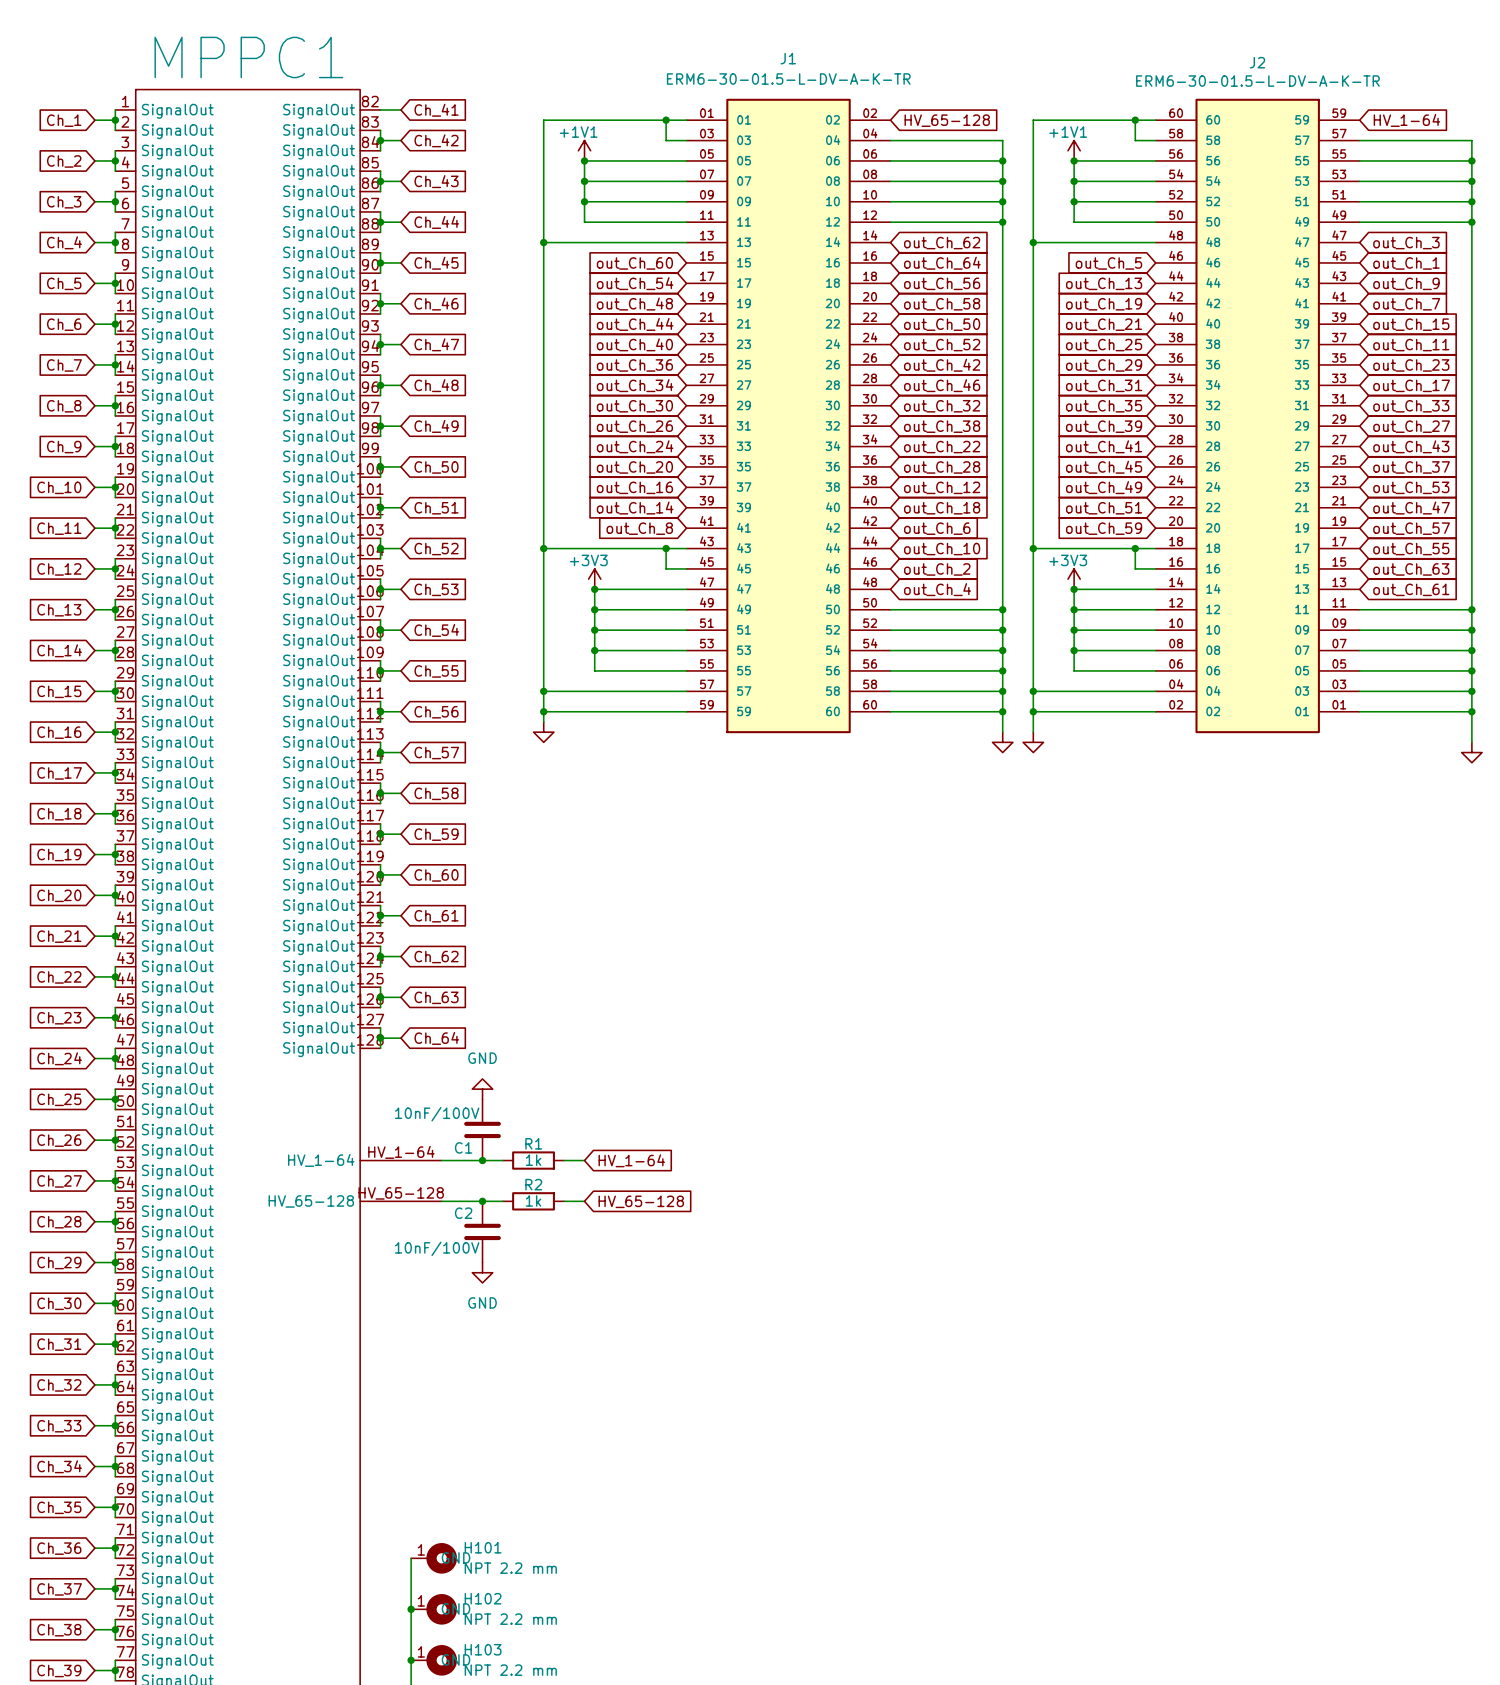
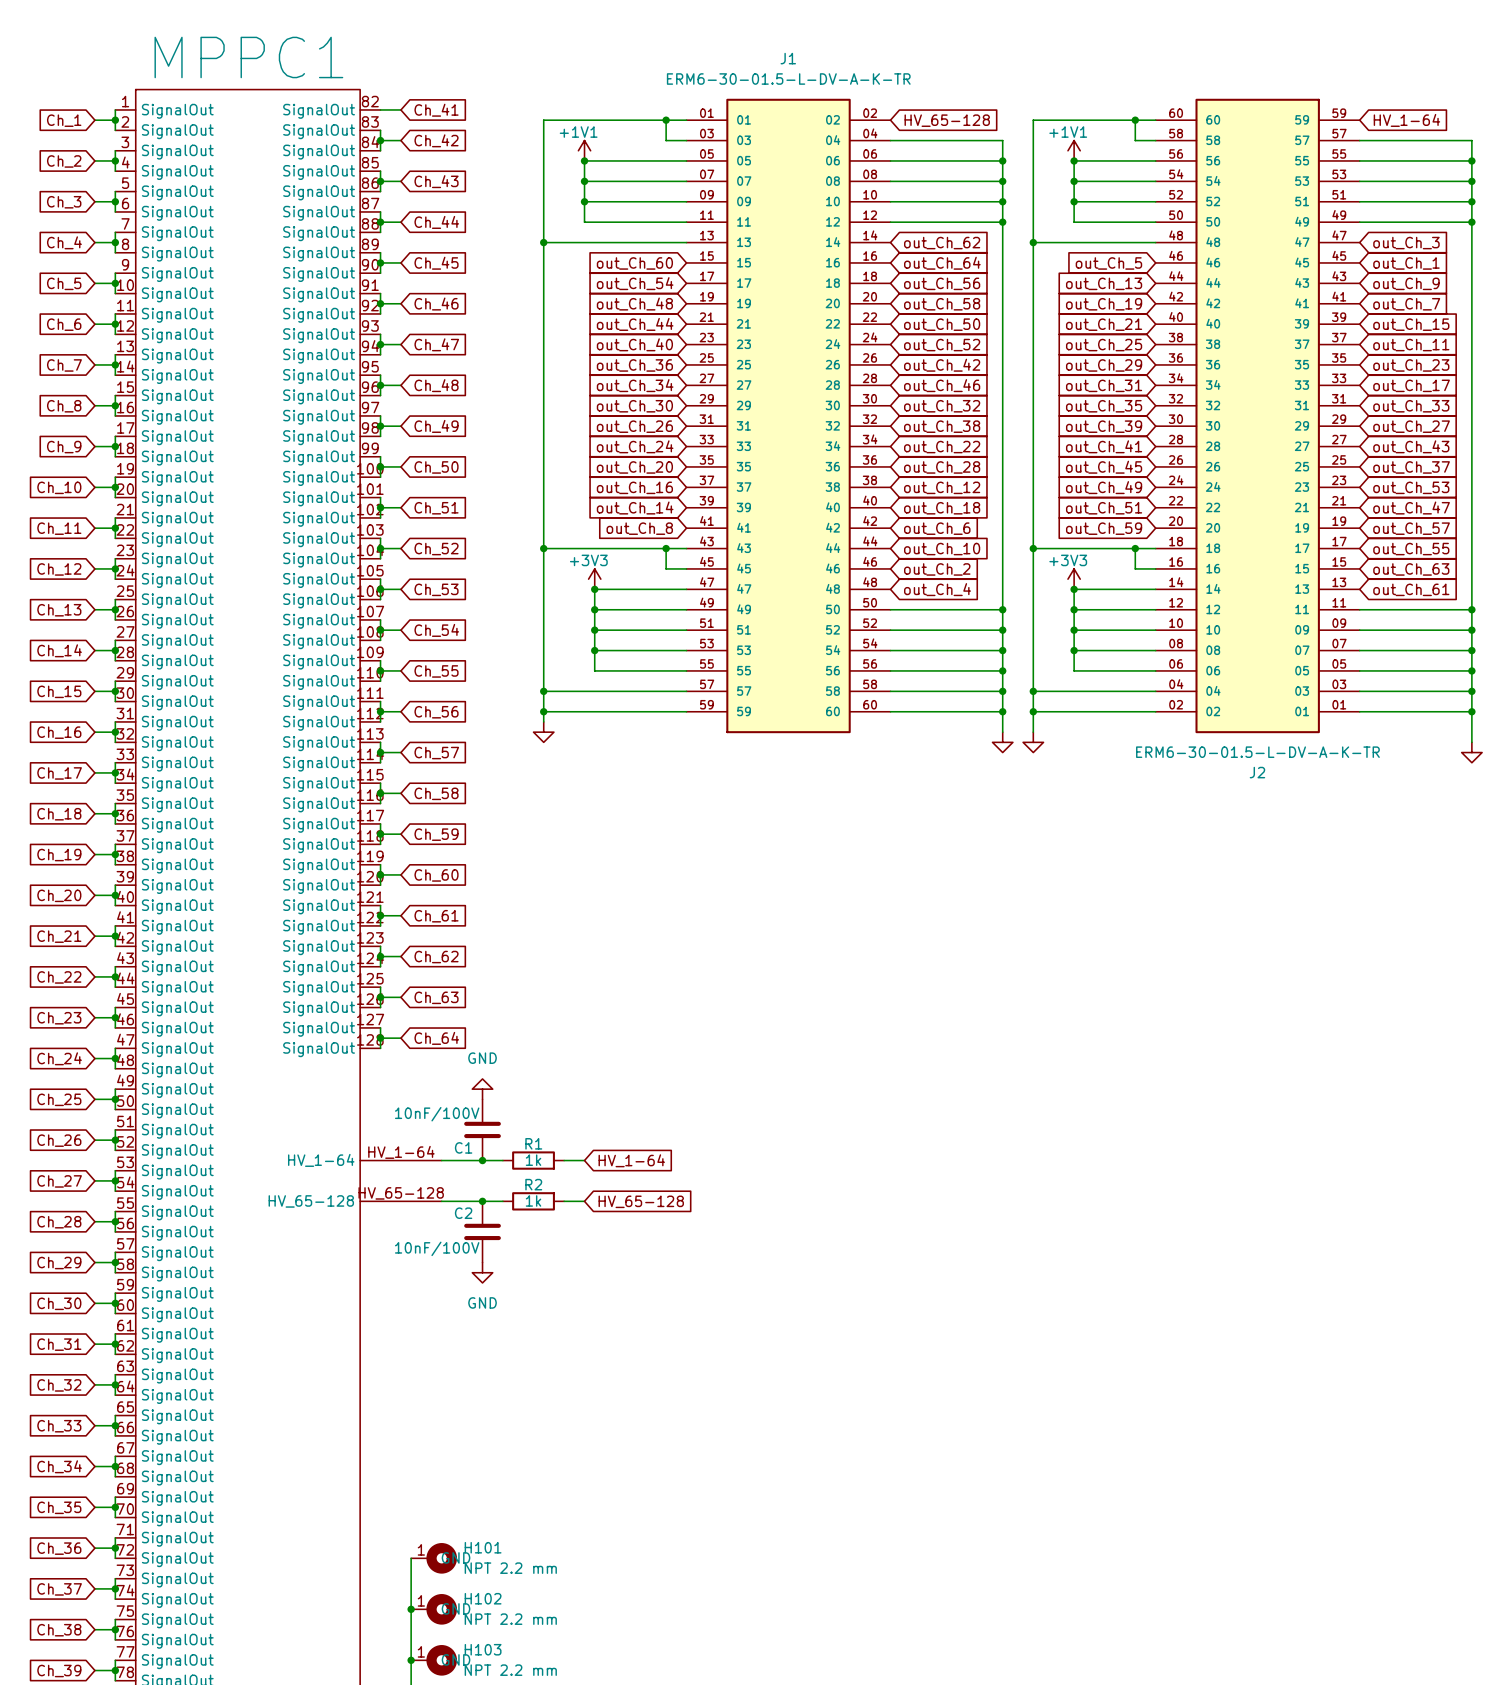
J2 name position: J2 (1257, 62) -> J2 (1257, 772)
J2 value position: ERM6-30-01.5-L-DV-A-K-TR (1257, 81) -> ERM6-30-01.5-L-DV-A-K-TR (1257, 752)

